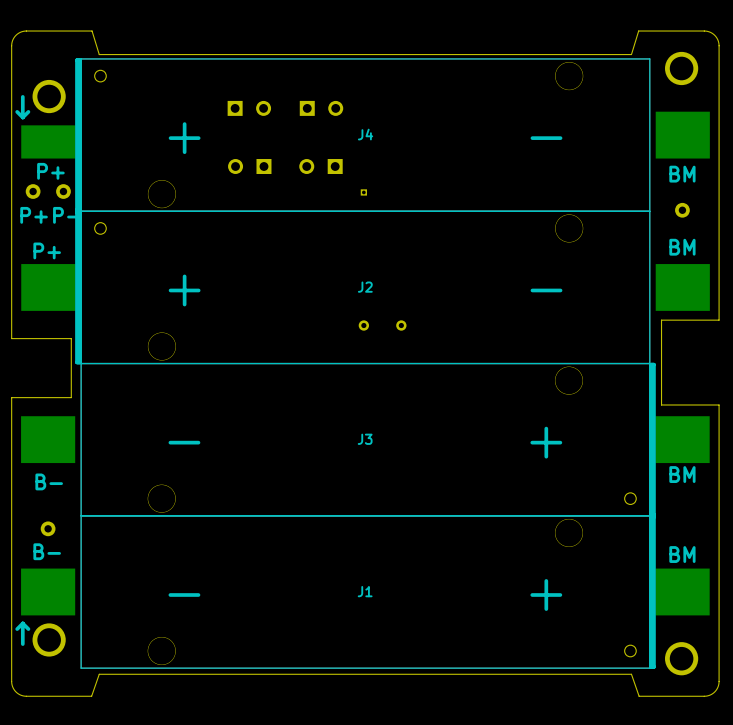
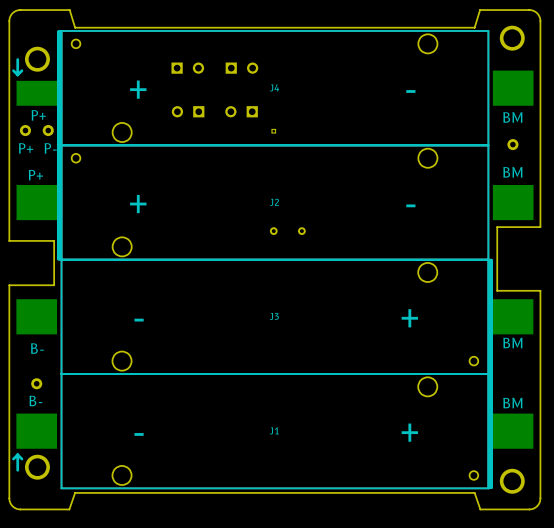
J4 footprint: [21, 58, 710, 212] -> [16, 30, 534, 146]
J2 footprint: [21, 210, 710, 365] -> [16, 144, 534, 261]
J3 footprint: [21, 362, 710, 517] -> [16, 259, 534, 375]
J1 footprint: [21, 515, 710, 669] -> [16, 373, 534, 489]

